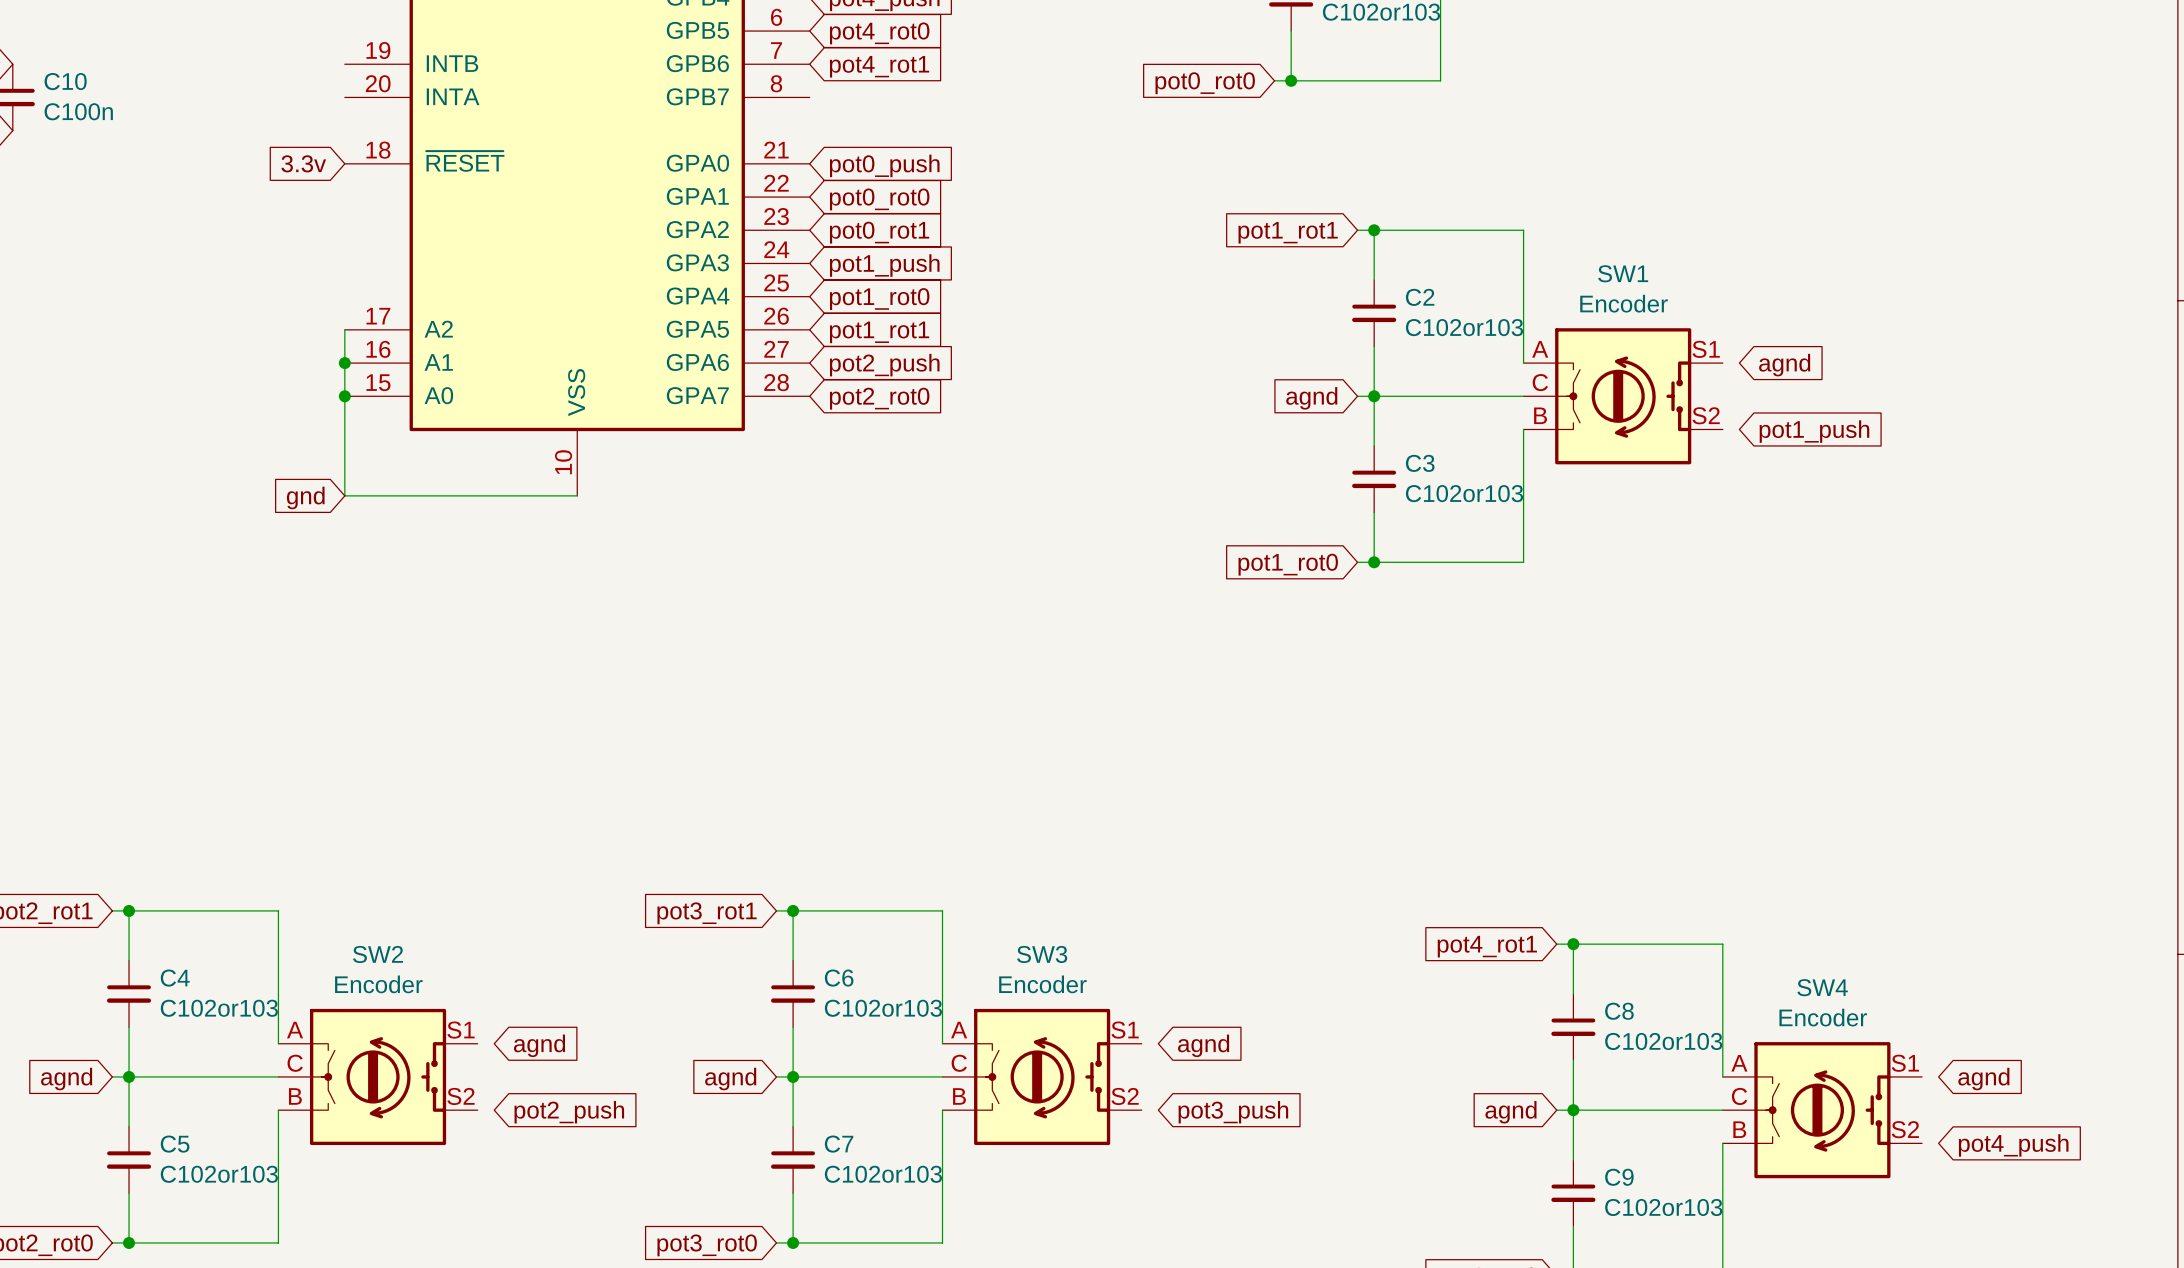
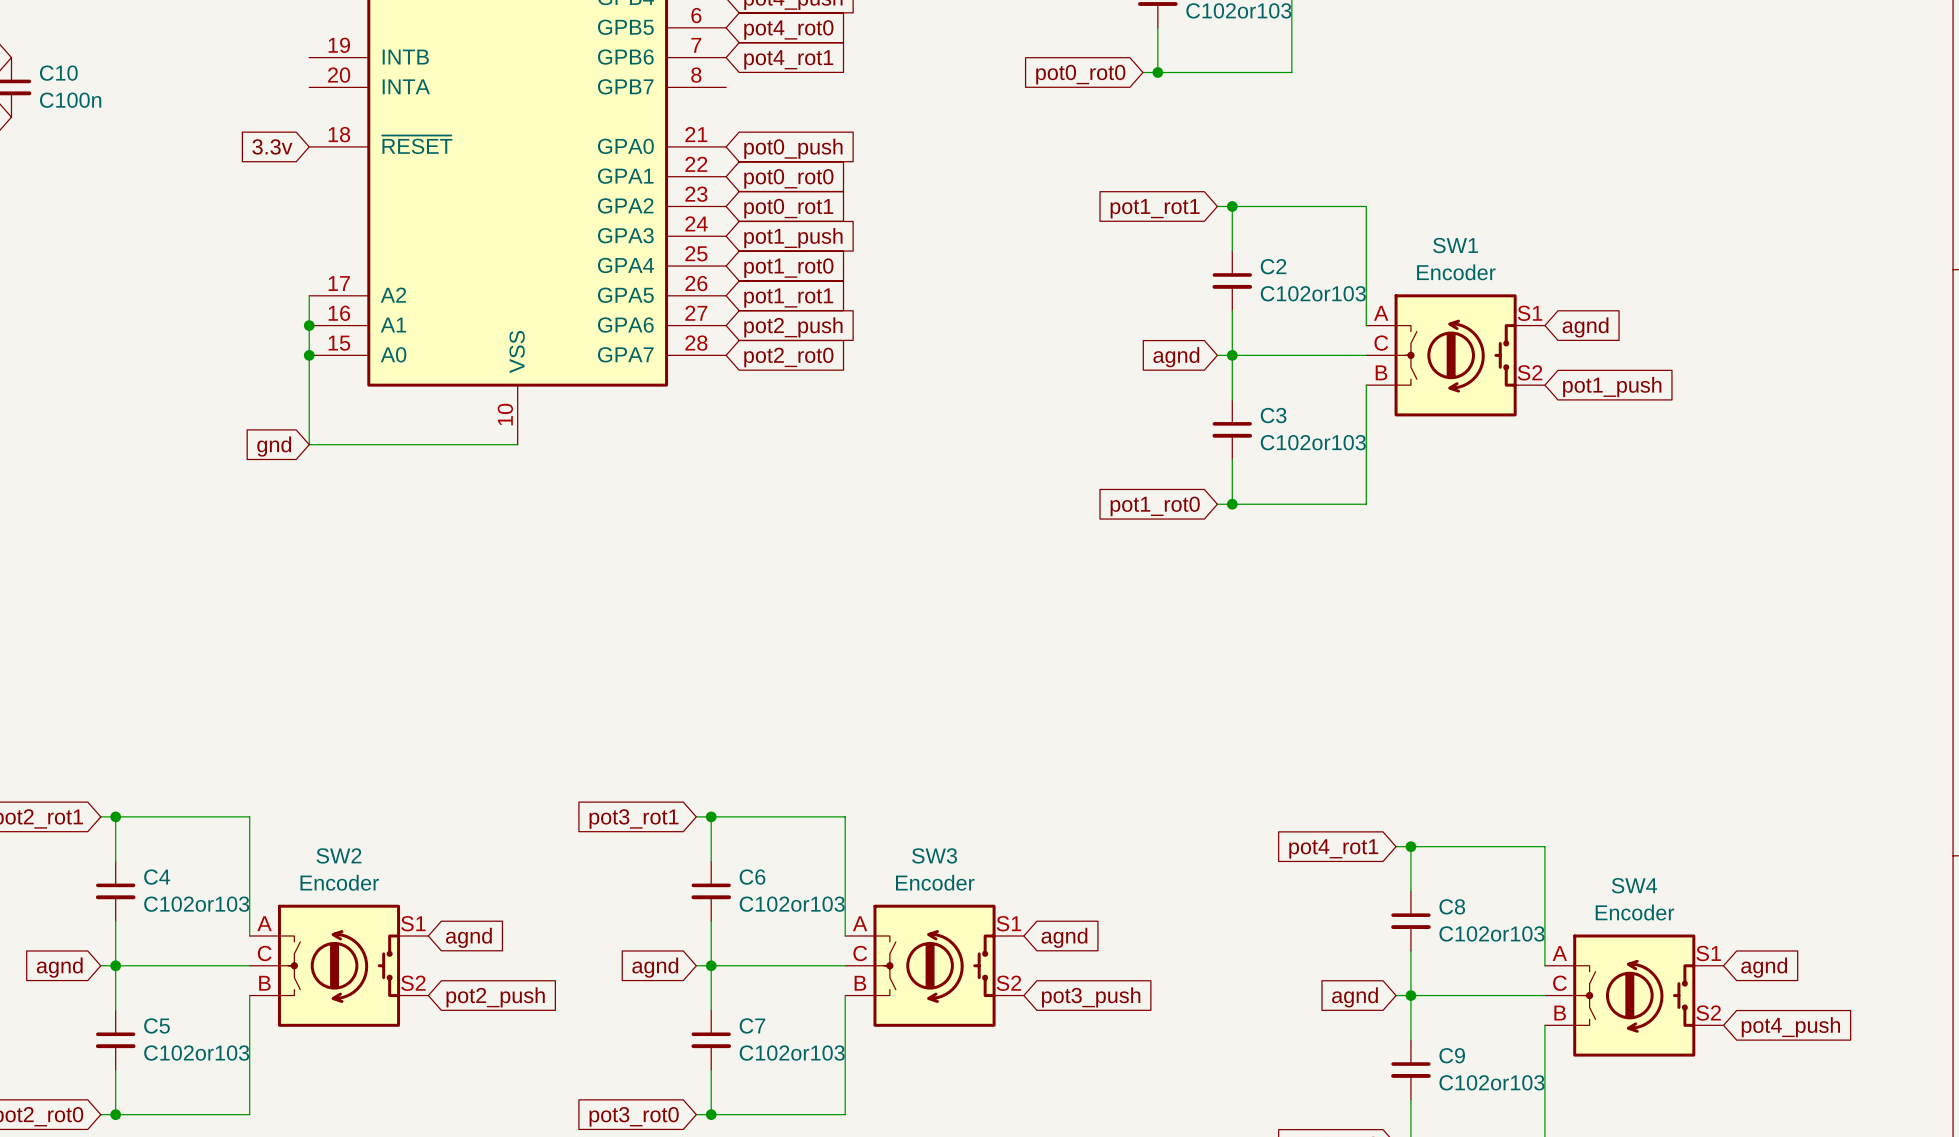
global label position: agnd (1784, 365) -> agnd (1585, 327)
global label position: pot1_push (1814, 431) -> pot1_push (1612, 386)
global label position: agnd (539, 1045) -> agnd (468, 937)
global label position: agnd (1203, 1045) -> agnd (1064, 937)
global label position: agnd (1983, 1079) -> agnd (1764, 967)
global label position: pot2_push (569, 1112) -> pot2_push (495, 997)
global label position: pot3_push (1233, 1112) -> pot3_push (1091, 997)
global label position: pot4_push (2013, 1145) -> pot4_push (1790, 1027)

